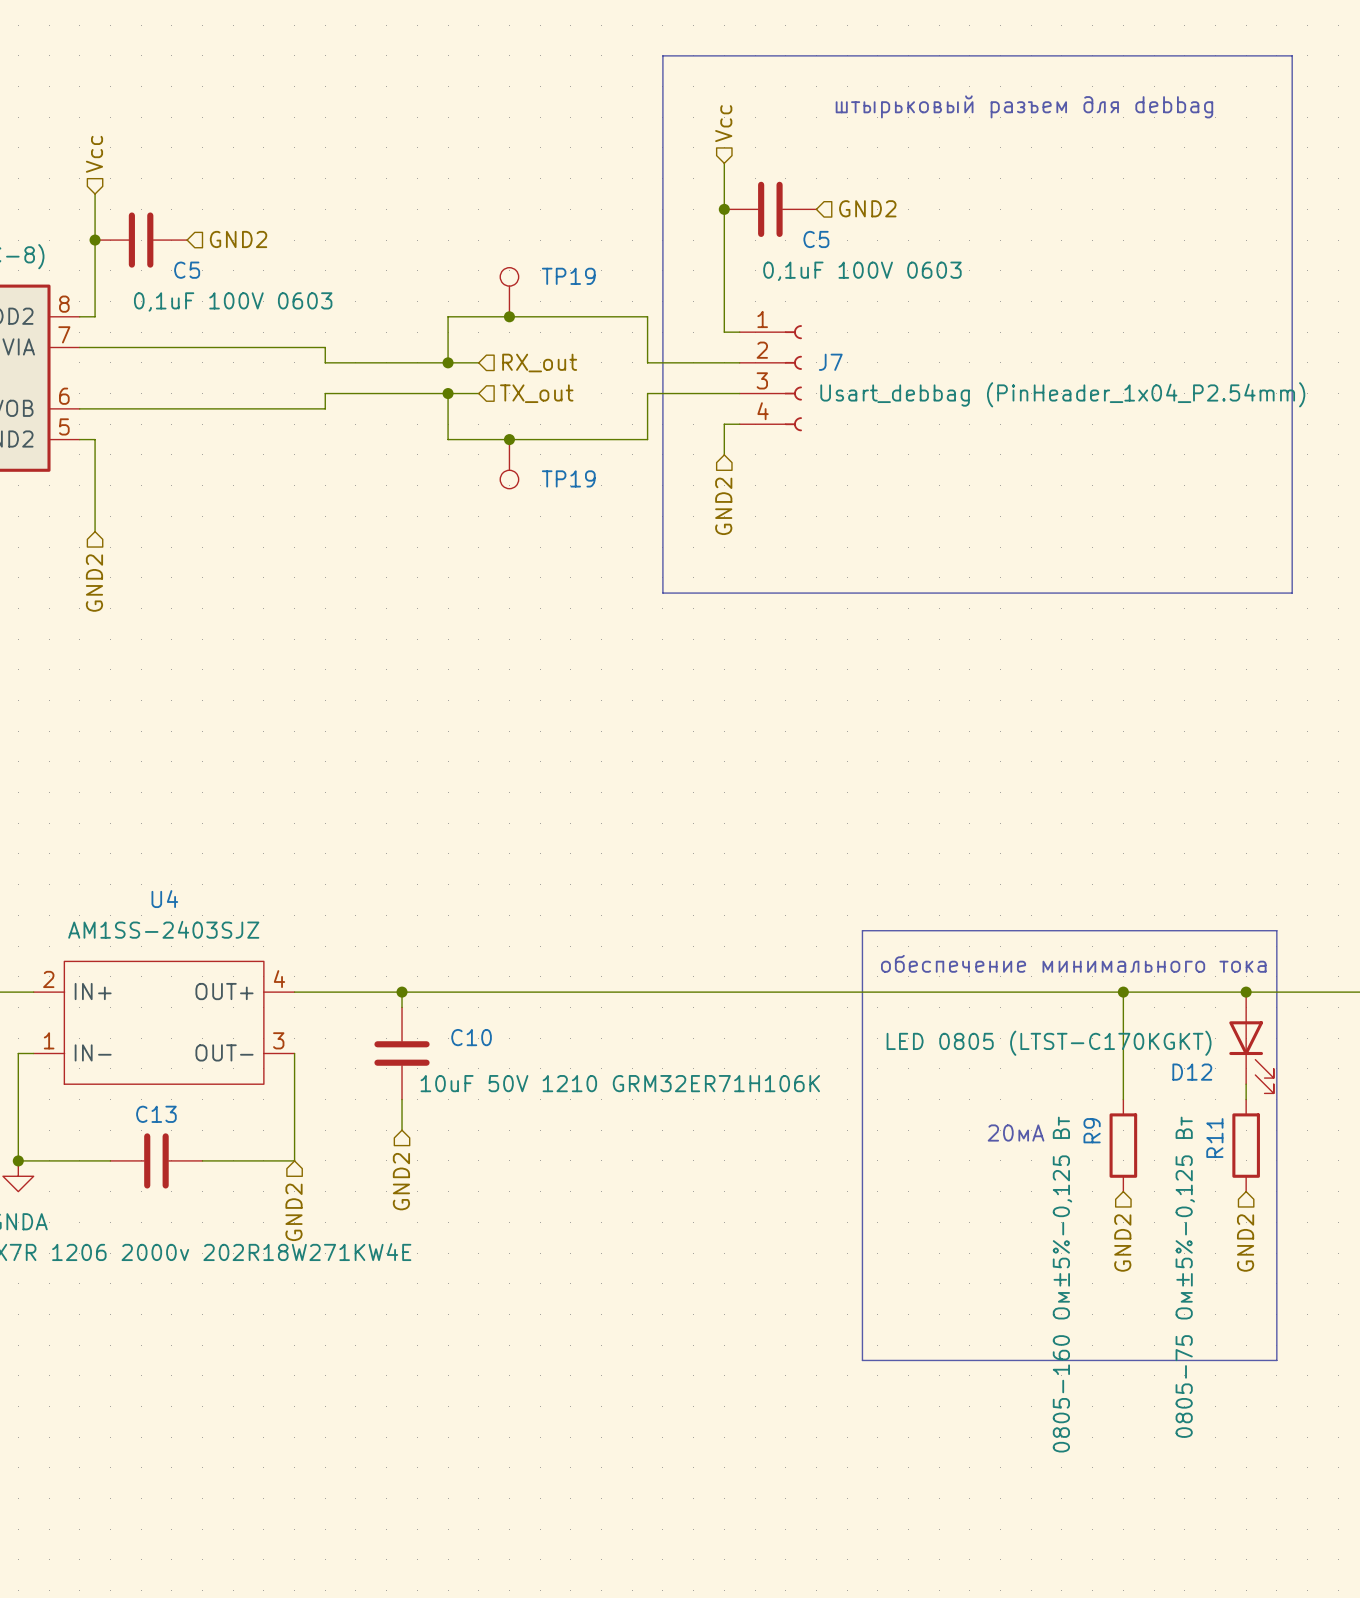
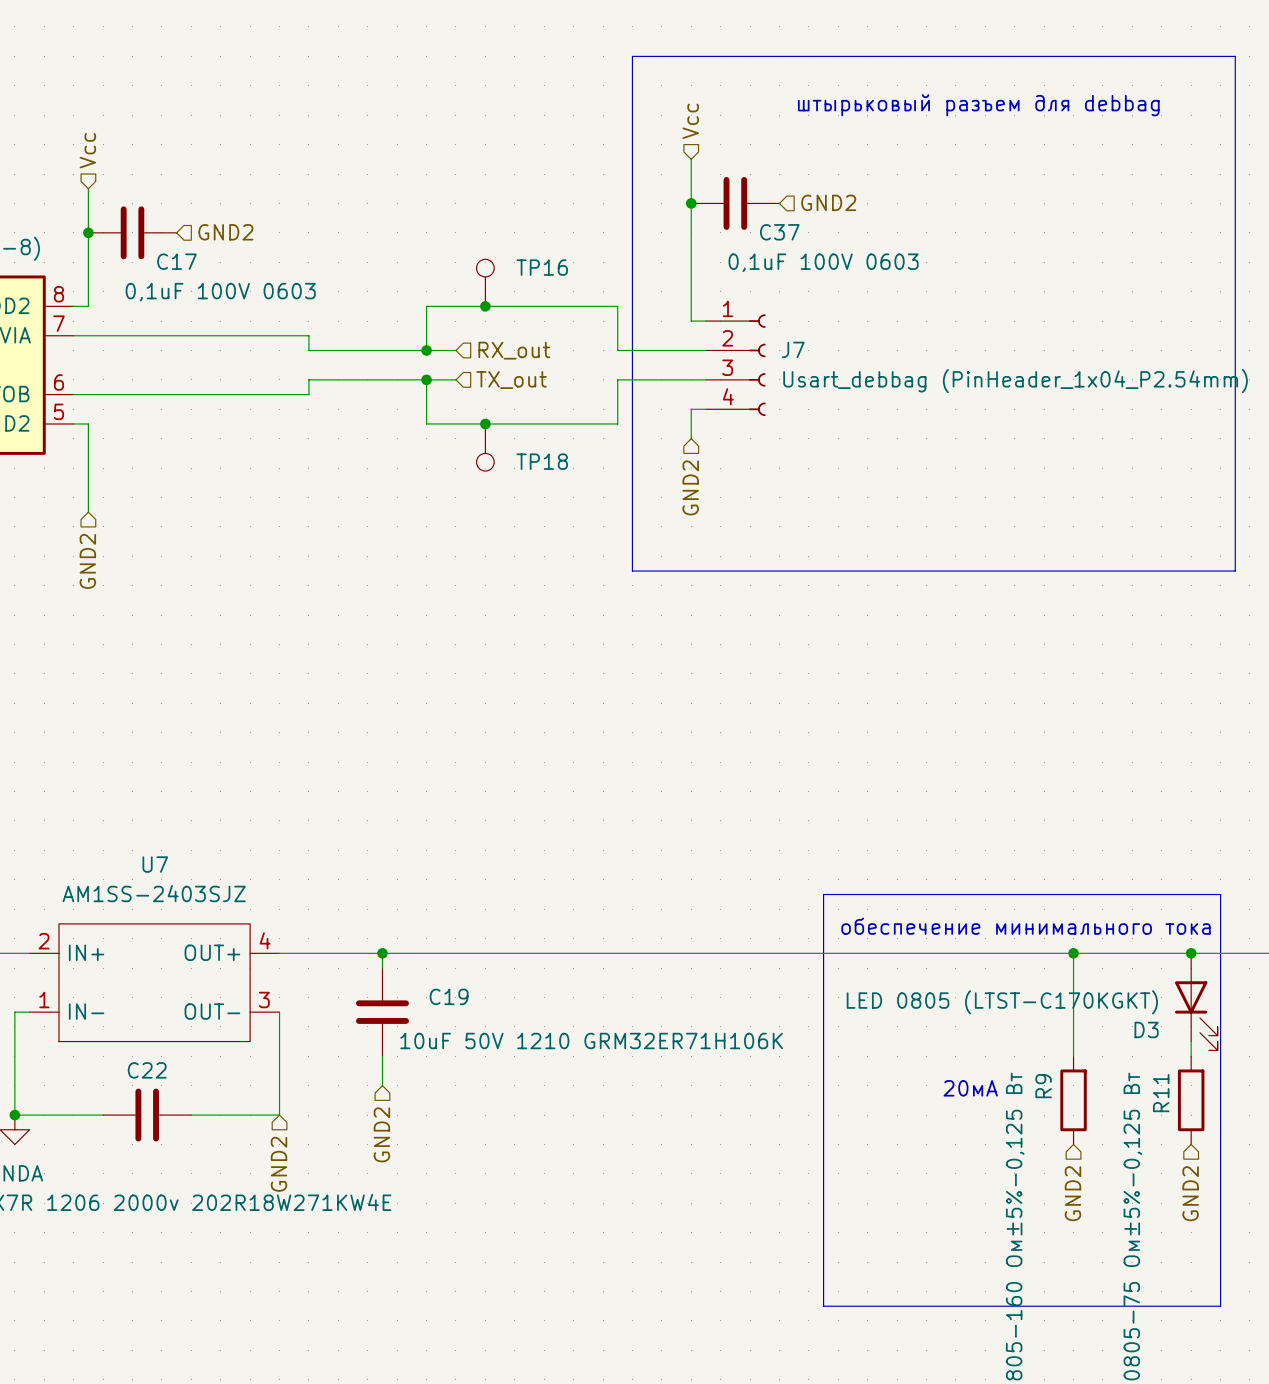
C5 name: C5 (816, 239) -> C37 (779, 232)
C5 name: C5 (187, 270) -> C17 (176, 261)
TP19 name: TP19 (568, 276) -> TP16 (542, 267)
TP19 name: TP19 (568, 478) -> TP18 (542, 461)
U4 name: U4 (164, 899) -> U7 (155, 864)
C10 name: C10 (471, 1037) -> C19 (449, 996)
D12 name: D12 (1192, 1072) -> D3 (1146, 1029)
C13 name: C13 (156, 1114) -> C22 (147, 1070)

